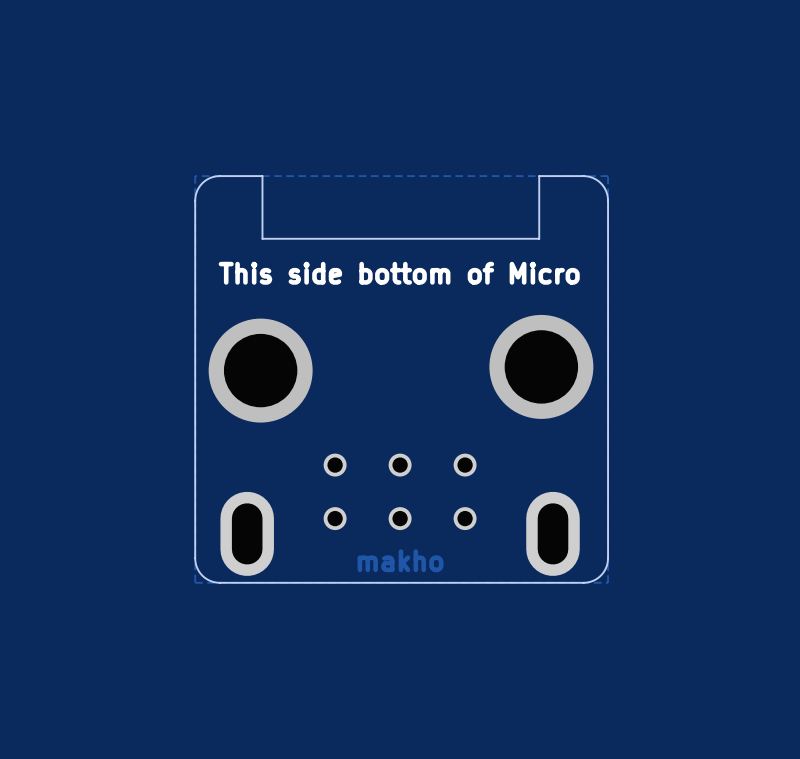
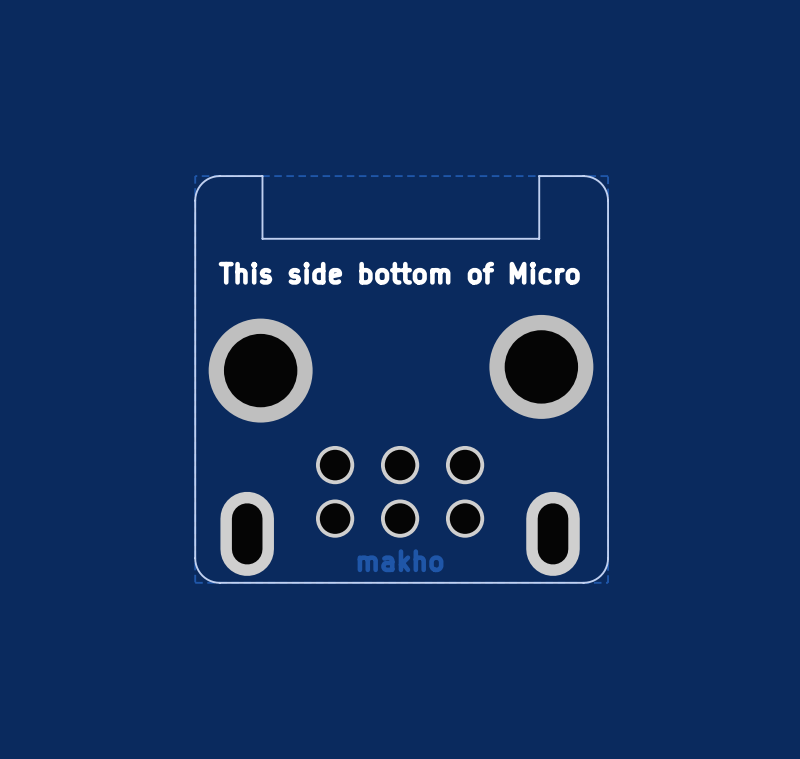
part footprint: [220, 453, 580, 576] -> [220, 445, 580, 576]

